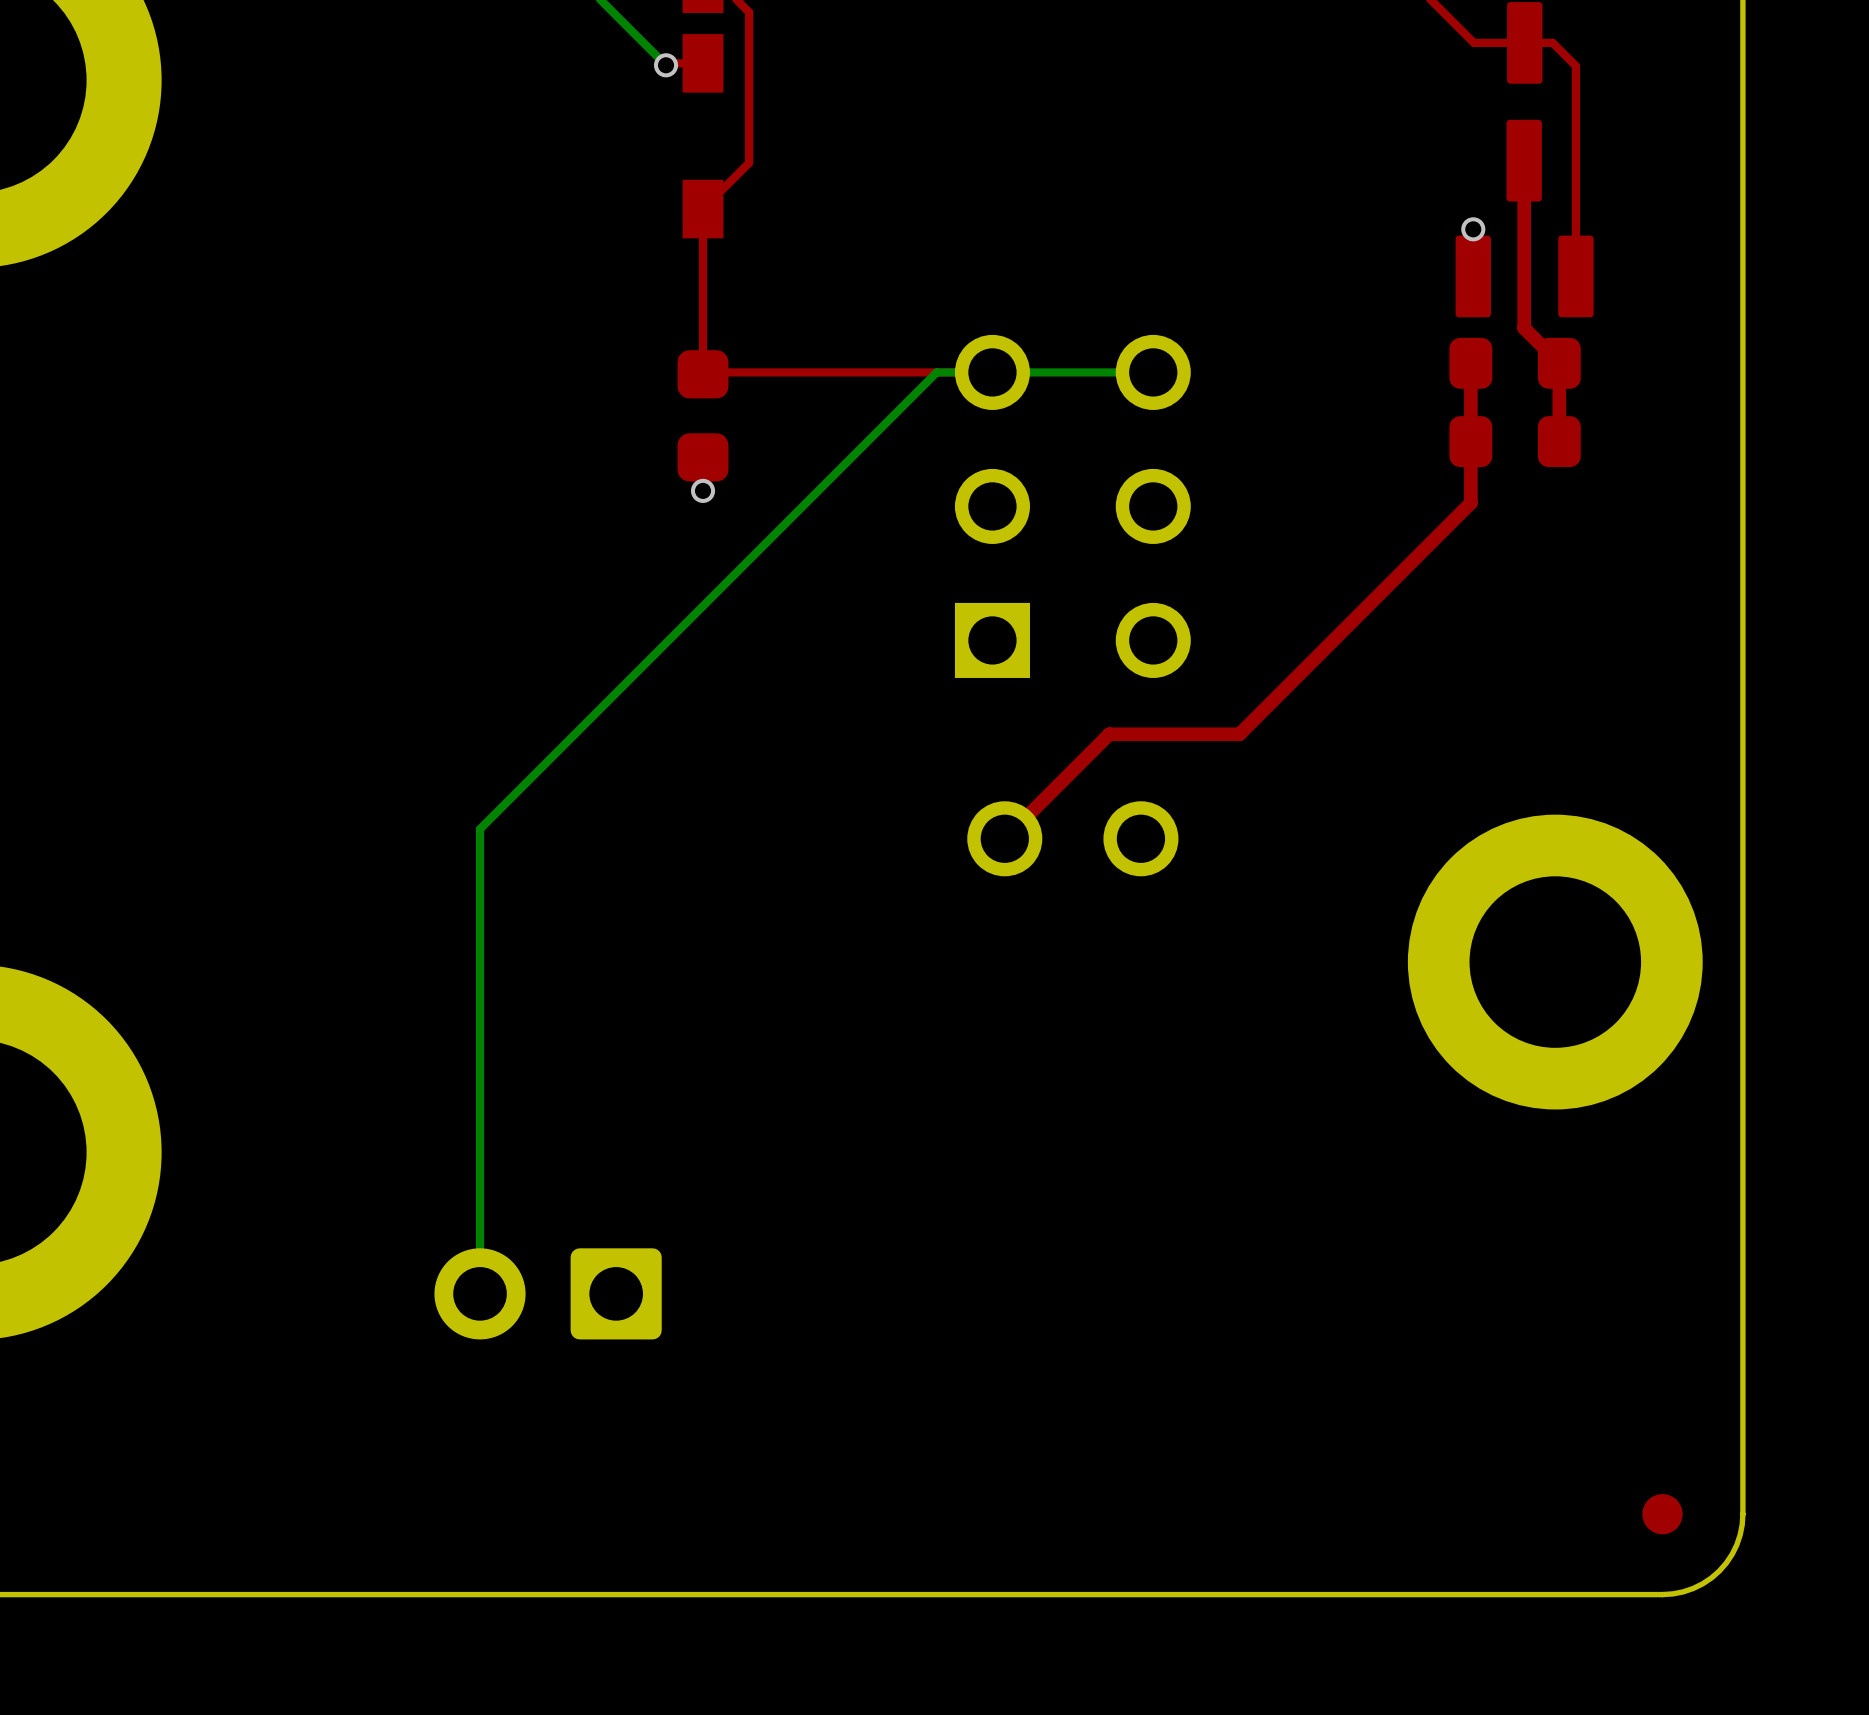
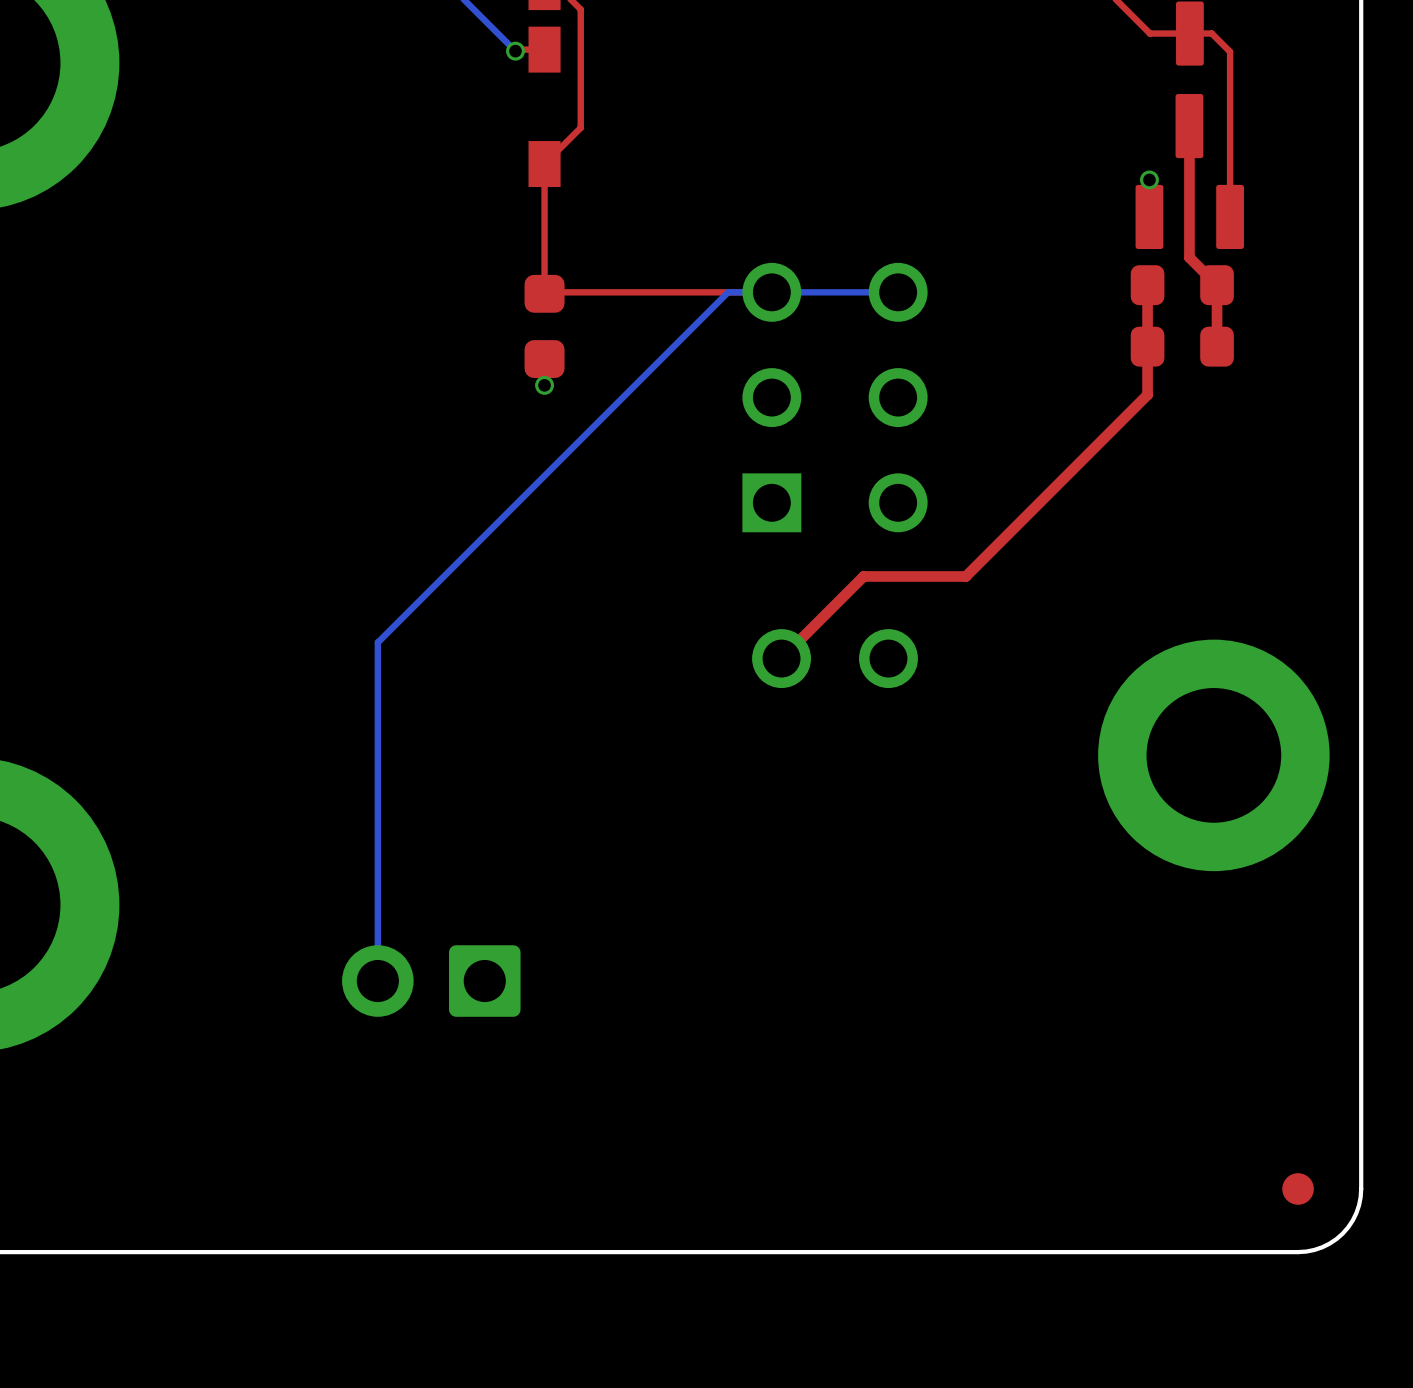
bottom track: (490, 818) (480, 829) (480, 1293) -> (377, 642) (377, 981)
part position: (548, 1293) -> (431, 981)

